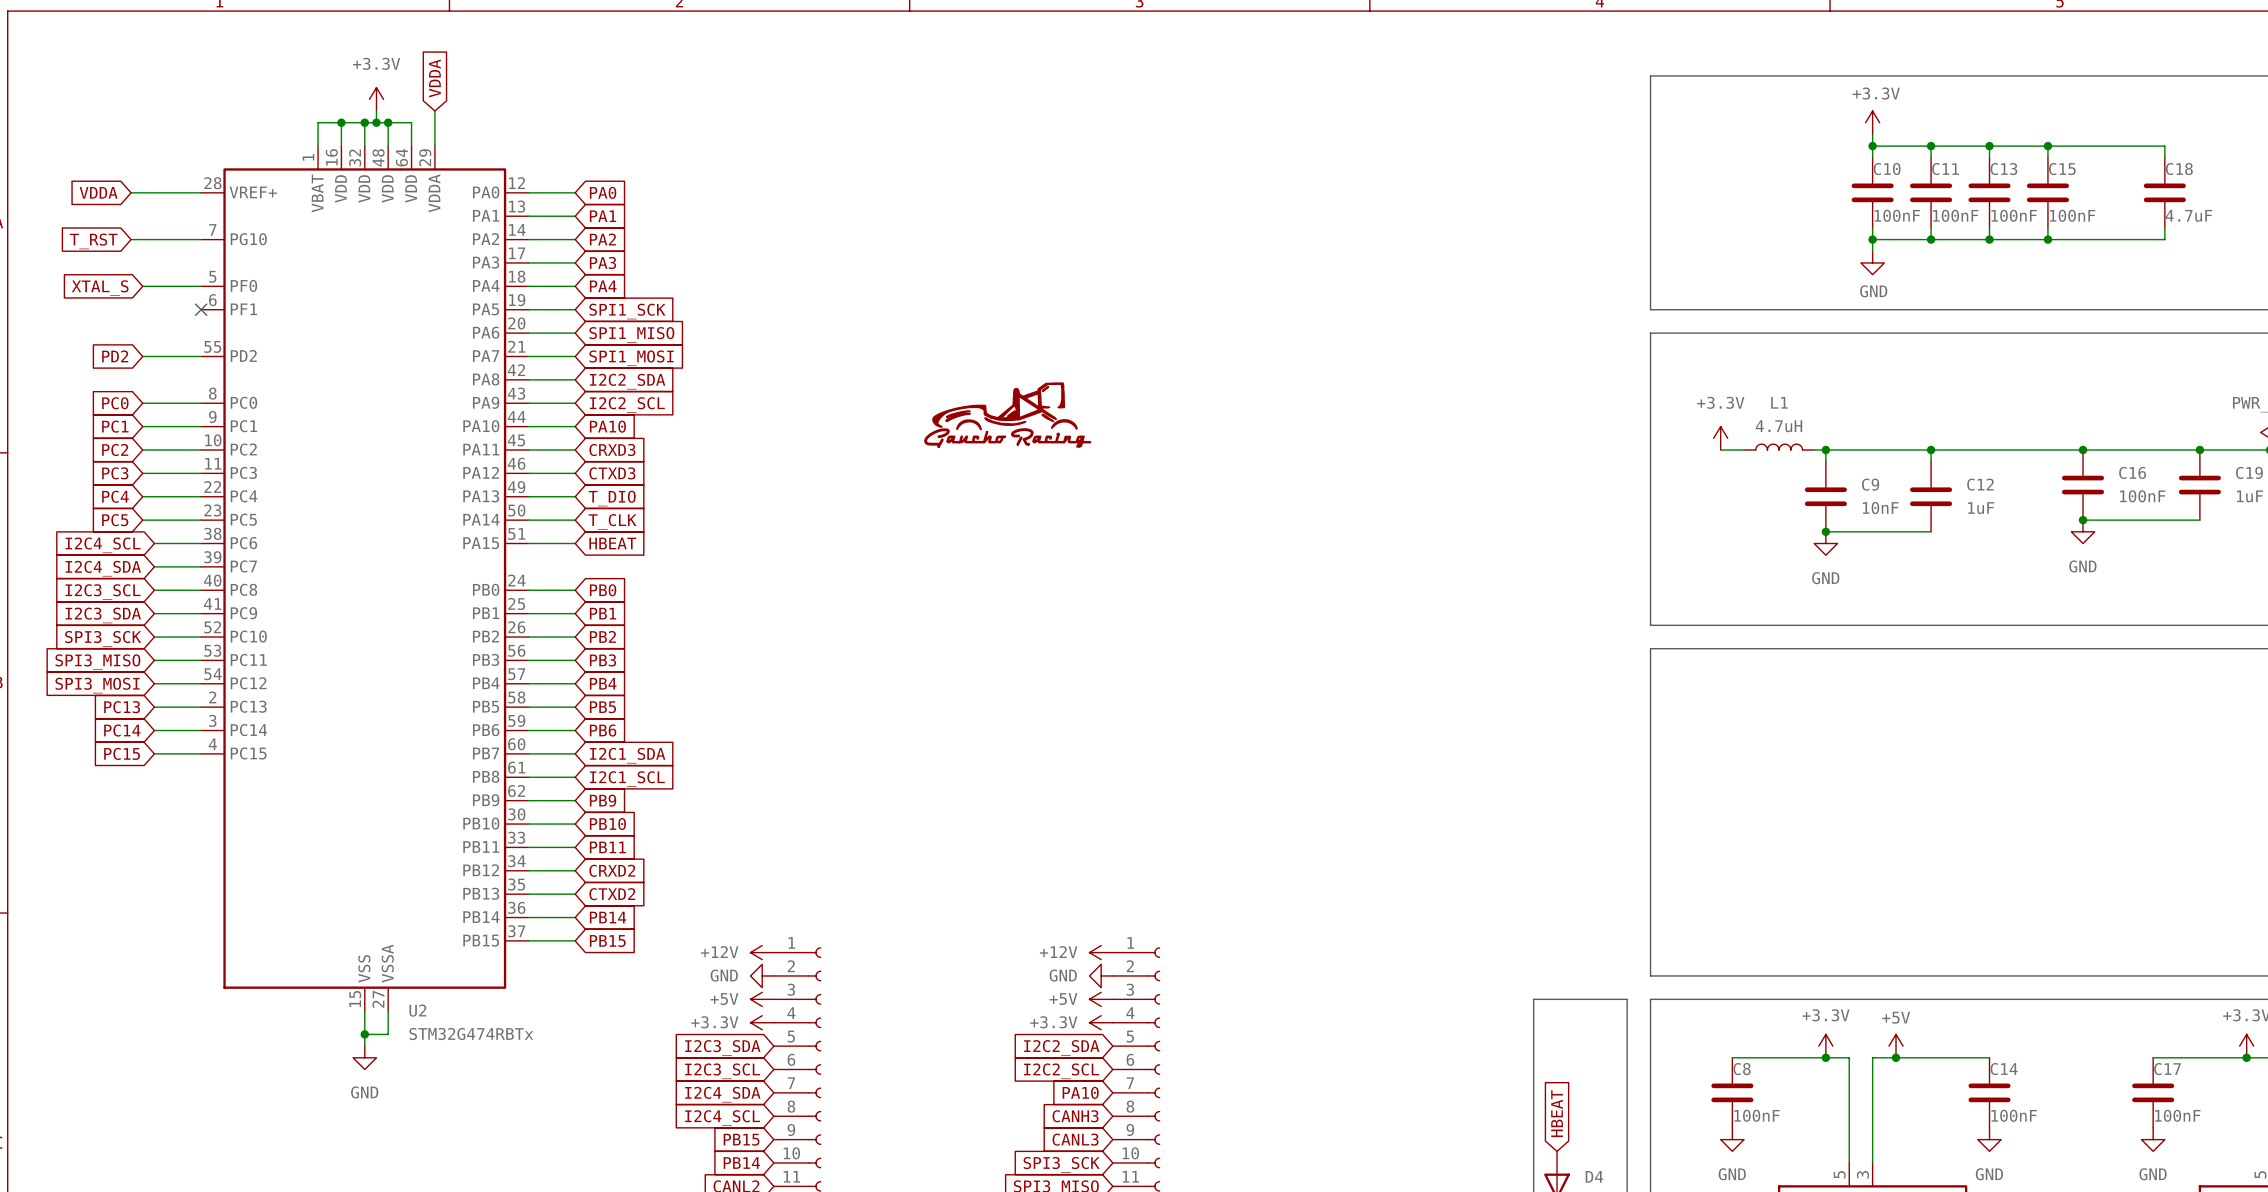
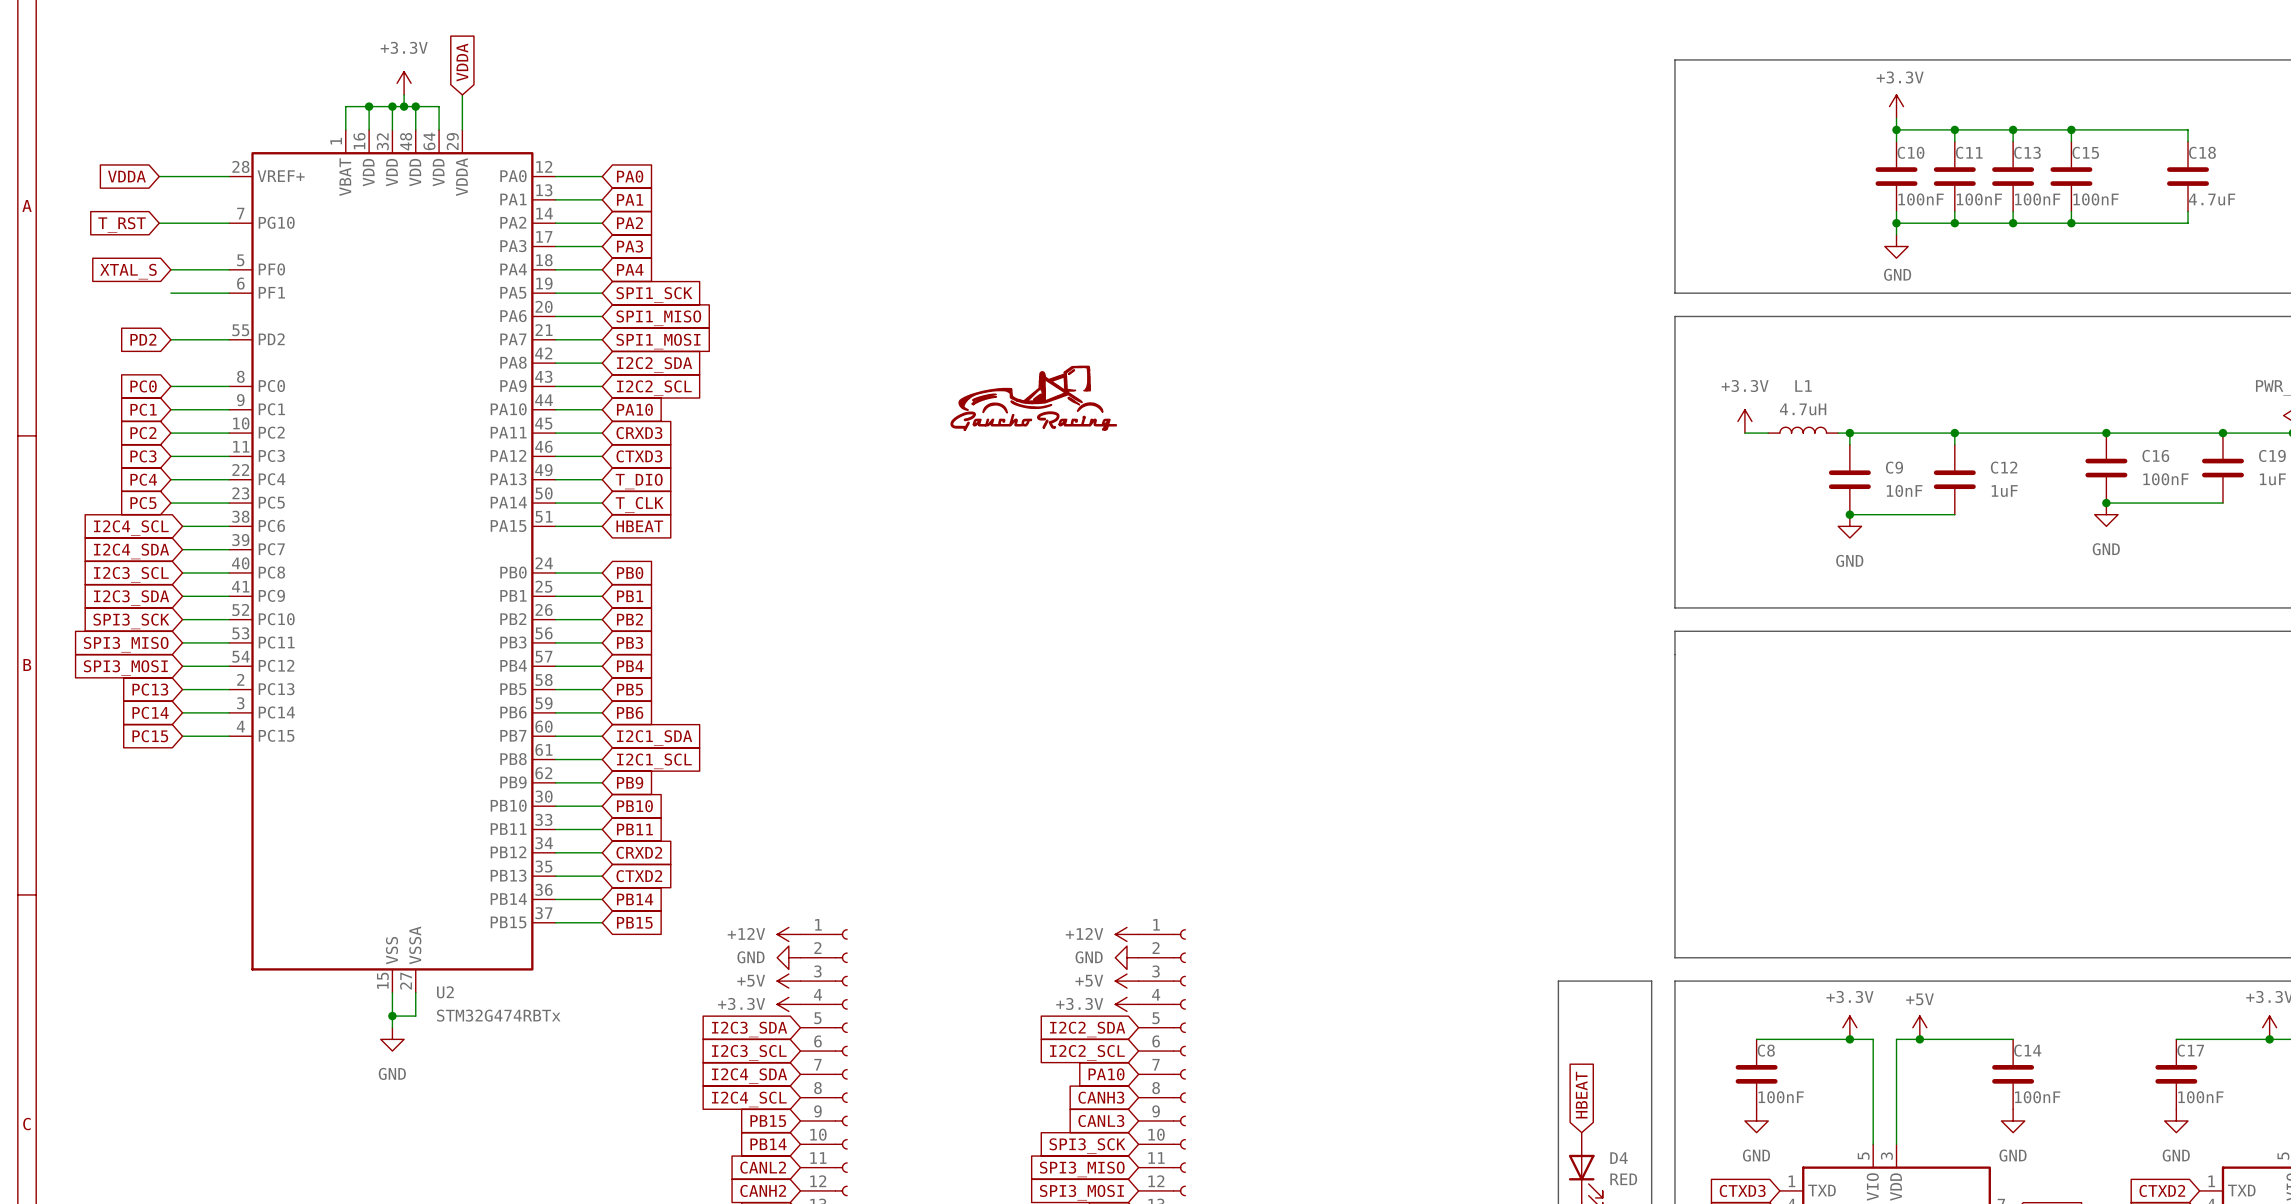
wire: none -> (170, 293) (229, 293)
no-connect mark: (201, 309) -> none

